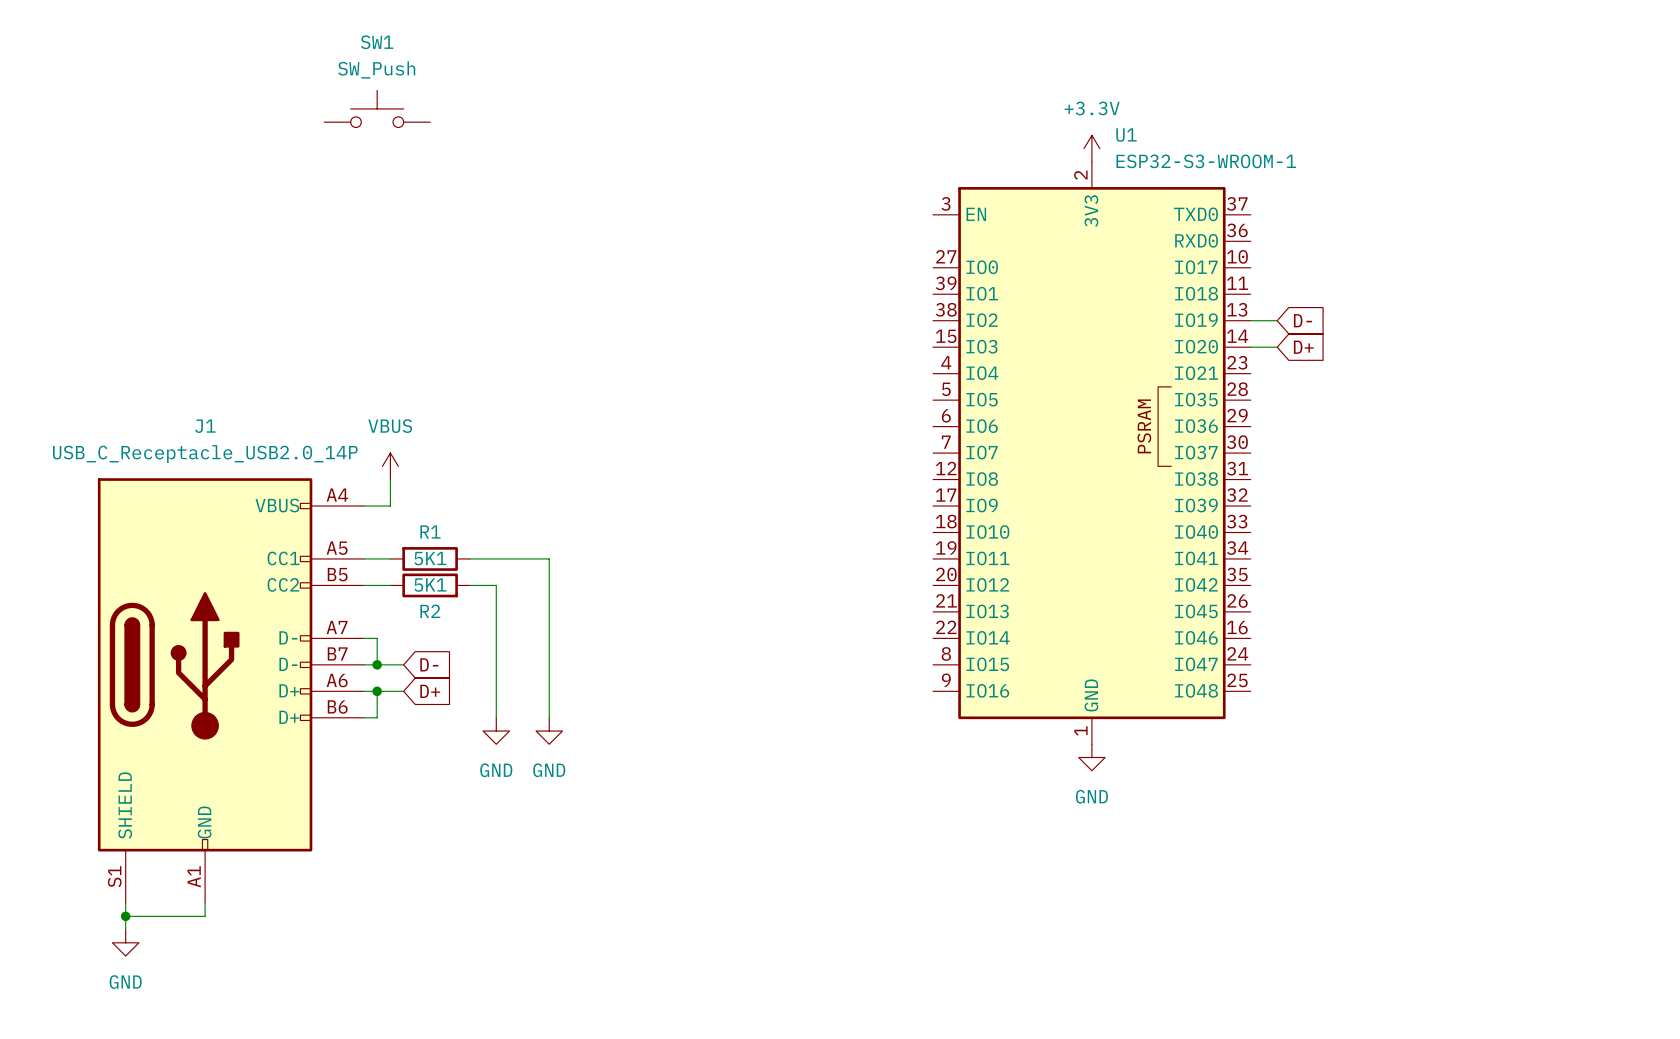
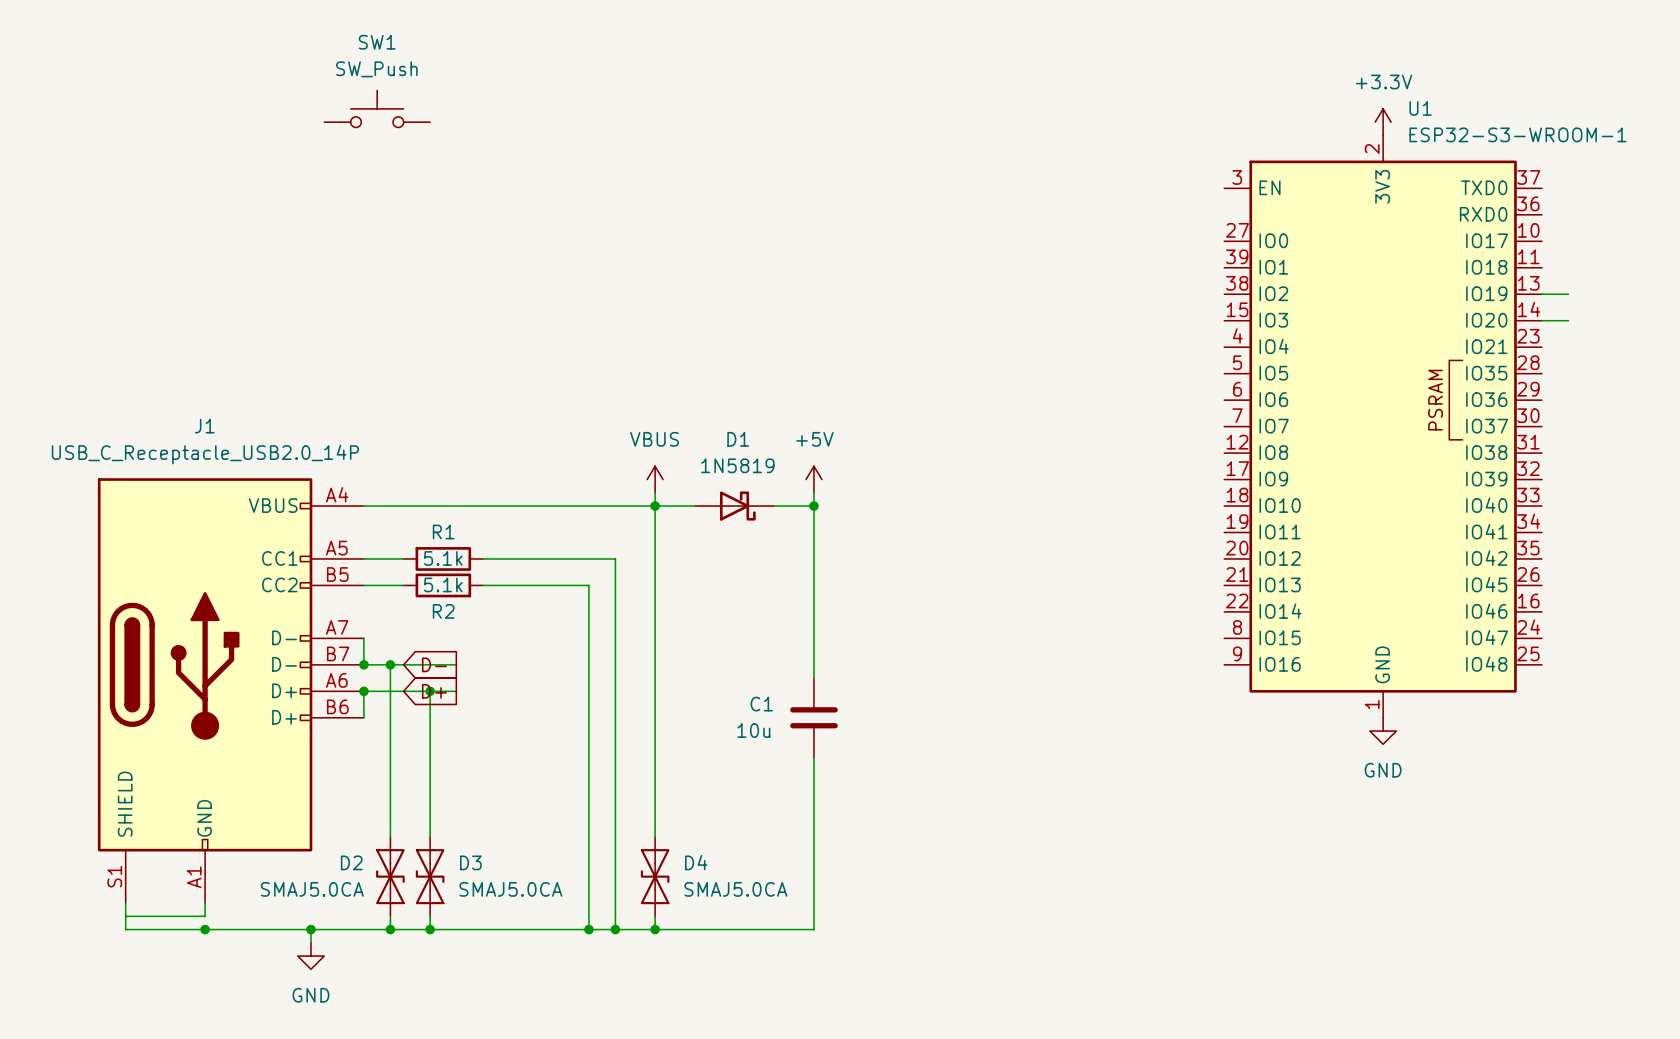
power symbol: none -> +3.3V (1383, 122)
power symbol: +3.3V (1091, 148) -> none
wire: none -> (1541, 294) (1568, 294)
global label: D- (1302, 320) -> none
wire: none -> (1541, 320) (1568, 320)
global label: D+ (1303, 347) -> none
U1 position: (1091, 453) -> (1383, 426)
power symbol: VBUS (390, 466) -> none
wire: (390, 479) (390, 506) -> (694, 506) (390, 506)
power symbol: none -> VBUS (655, 479)
power symbol: none -> +5V (813, 479)
wire: none -> (655, 492) (655, 836)
wire: none -> (813, 492) (813, 678)
junction: none -> (655, 506)
D1: none -> 1N5819 (734, 506)
wire: none -> (774, 506) (813, 506)
junction: none -> (813, 506)
R1 position: (430, 558) -> (443, 558)
R1 value: 5K1 (430, 558) -> 5.1k (443, 558)
wire: (549, 558) (549, 717) -> (549, 558) (615, 558) (615, 929)
R2 position: (430, 585) -> (443, 585)
R2 value: 5K1 (430, 585) -> 5.1k (443, 584)
wire: (496, 585) (496, 717) -> (496, 585) (588, 585) (588, 929)
wire: (363, 638) (377, 638) (377, 664) -> (363, 638) (363, 664)
junction: none -> (363, 664)
junction: (377, 664) -> none
wire: none -> (390, 664) (390, 836)
junction: none -> (390, 664)
wire: none -> (403, 664) (456, 664)
wire: (377, 691) (377, 717) (363, 717) -> (363, 691) (363, 717)
junction position: (377, 691) -> (363, 691)
wire: none -> (403, 691) (456, 691)
wire: none -> (430, 691) (430, 836)
junction: none -> (430, 691)
C1: none -> 10u (813, 717)
power symbol: GND (496, 731) -> none
power symbol: GND (549, 731) -> none
power symbol: none -> GND (1383, 731)
wire: none -> (813, 757) (813, 929) (125, 929)
power symbol: GND (1091, 757) -> none
D2: none -> SMAJ5.0CA (390, 876)
D3: none -> SMAJ5.0CA (430, 876)
D4: none -> SMAJ5.0CA (655, 876)
junction: (125, 916) -> none
wire: none -> (390, 916) (390, 929)
wire: none -> (430, 916) (430, 929)
wire: none -> (655, 916) (655, 929)
junction: none -> (205, 929)
wire: none -> (310, 929) (310, 942)
junction: none -> (310, 929)
junction: none -> (390, 929)
junction: none -> (430, 929)
junction: none -> (588, 929)
junction: none -> (615, 929)
junction: none -> (655, 929)
power symbol: GND (125, 942) -> none
power symbol: none -> GND (310, 956)

